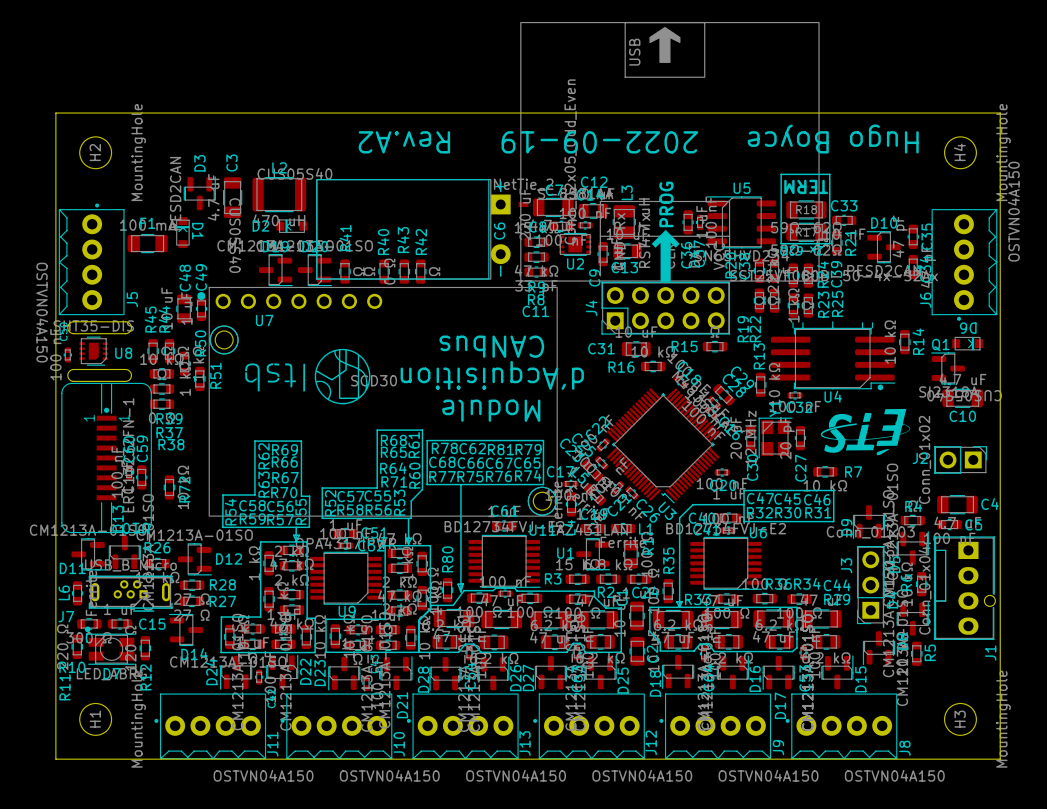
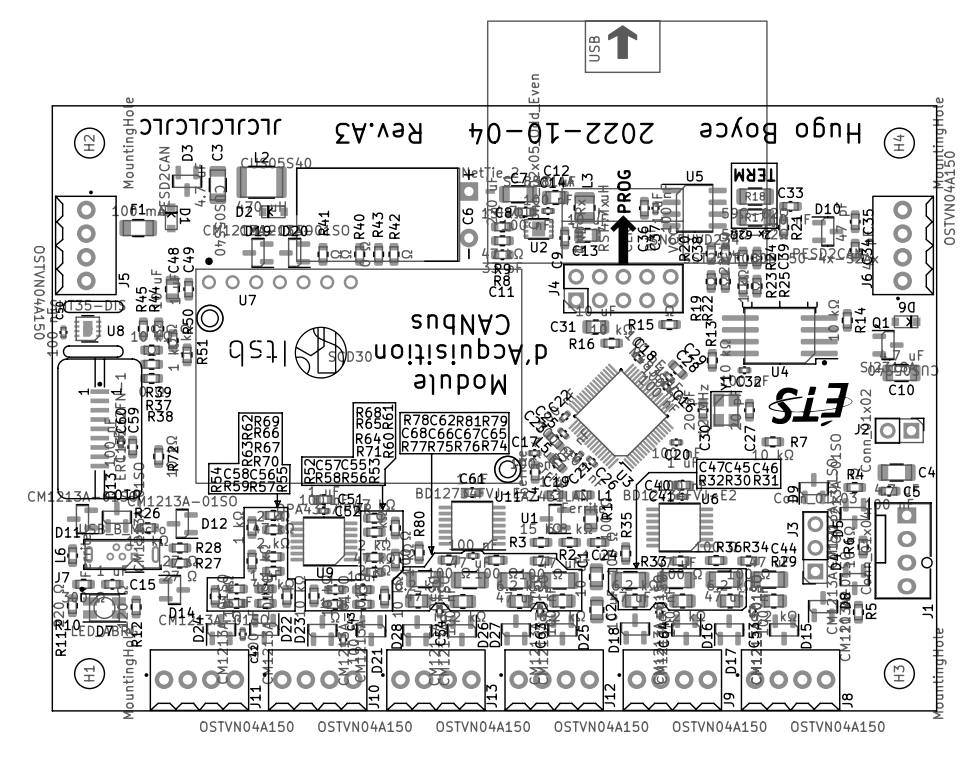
text: none -> JLCJLCJLCJLC (210, 126)
text: Hugo Boyce 2022-09-19 Rev.A2 (638, 139) -> Hugo Boyce 2022-10-04 Rev.A3 (598, 130)
C6 footprint: [316, 179, 511, 280] -> [296, 167, 479, 262]
U7 footprint: [197, 286, 558, 517] -> [195, 257, 523, 484]

